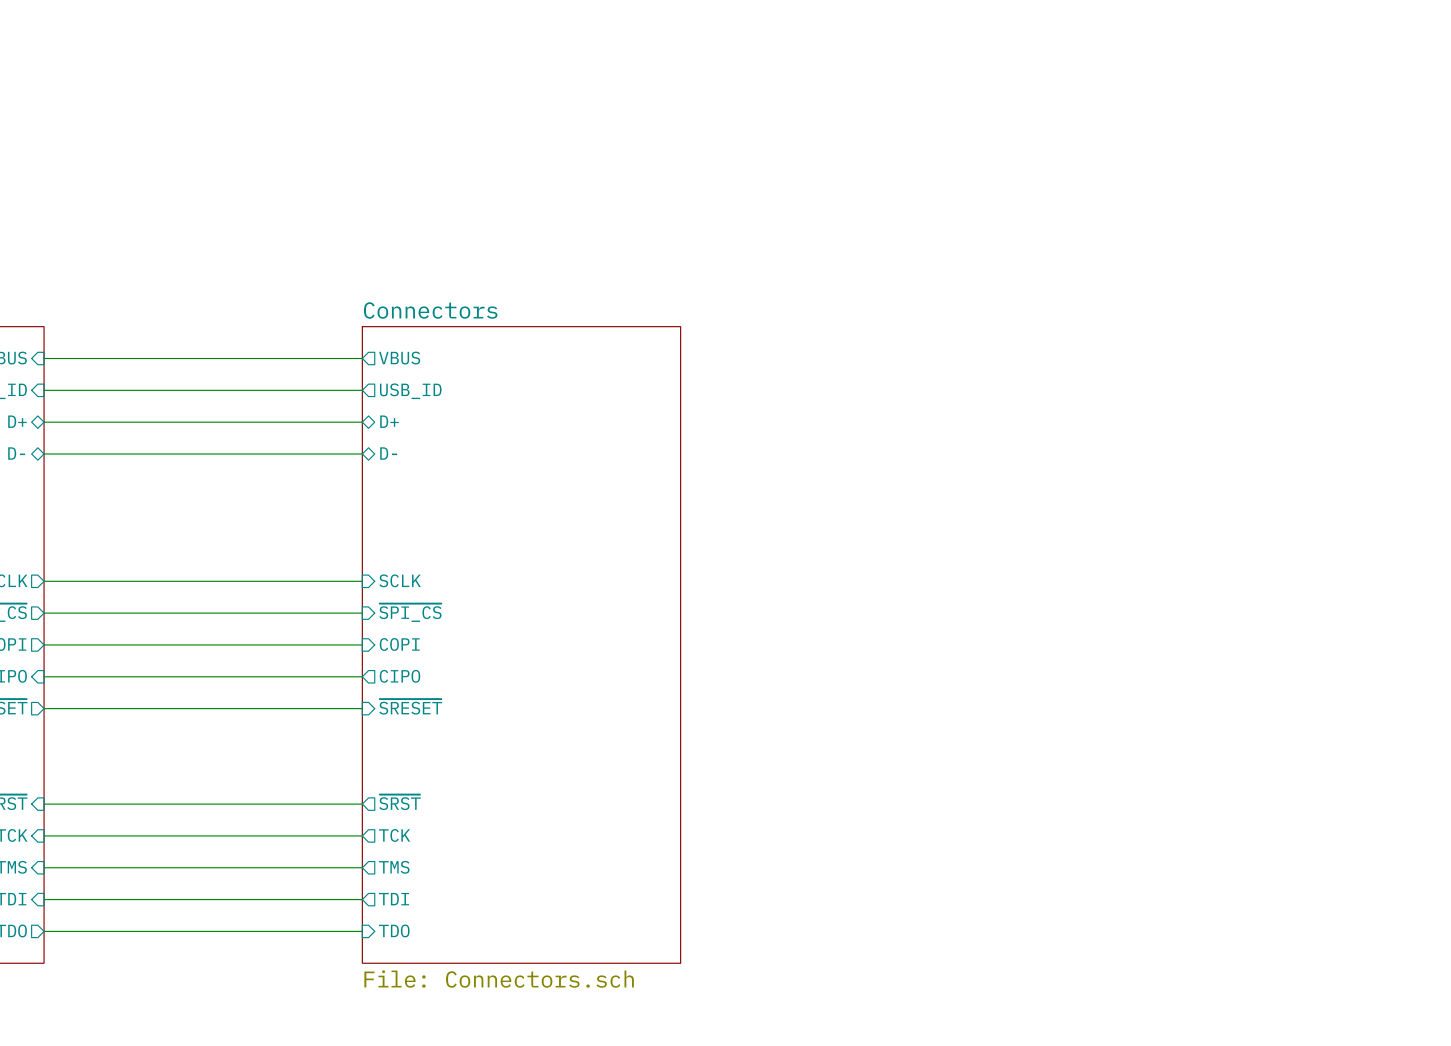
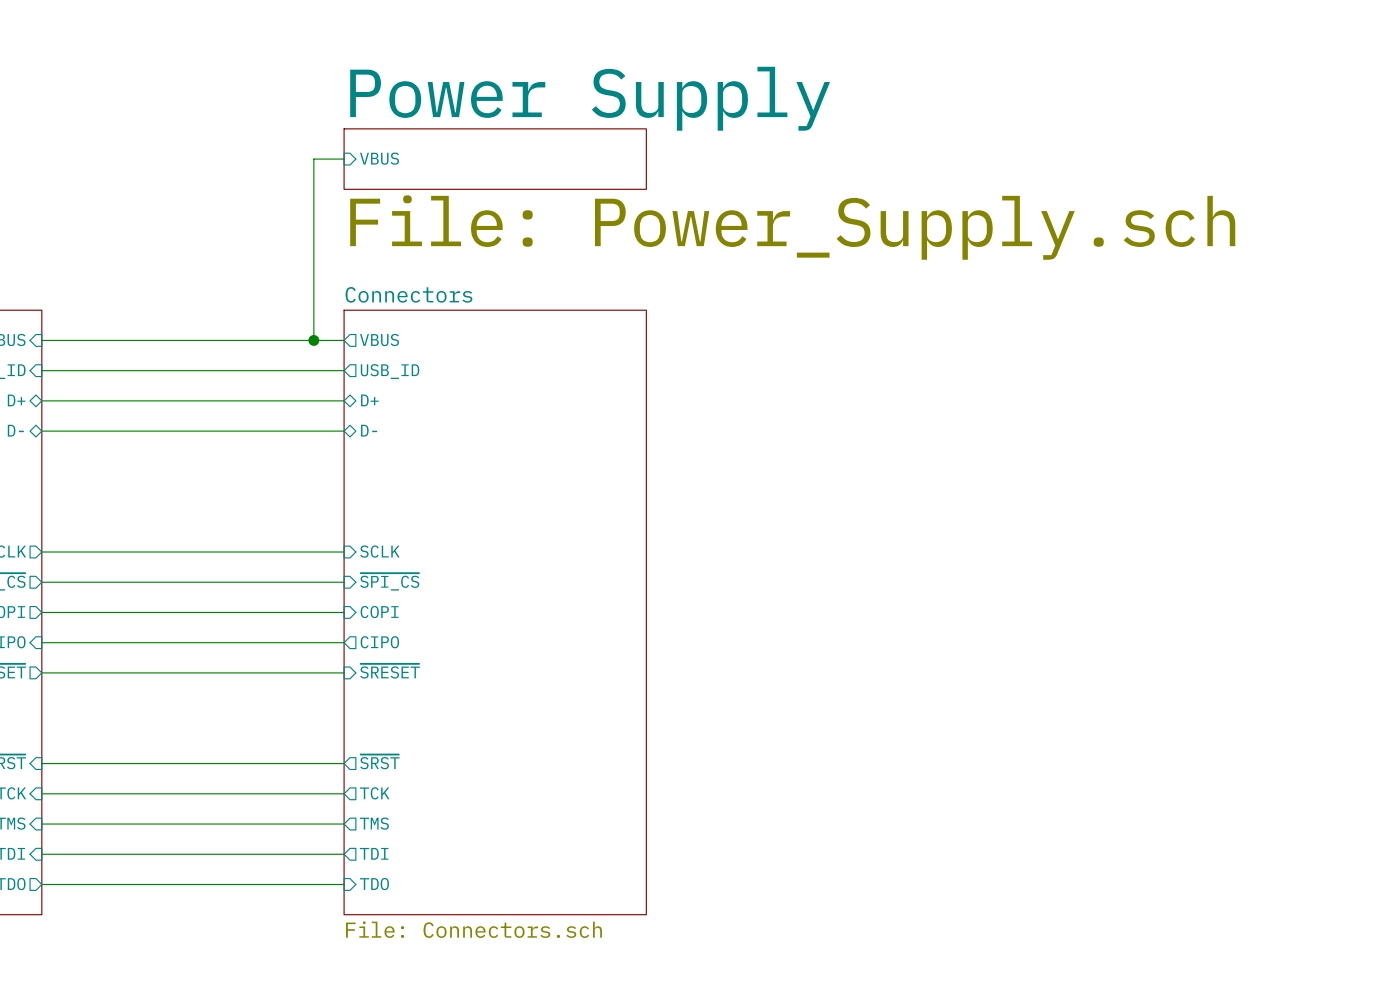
wire: none -> (344, 159) (313, 159) (313, 340)
sheet pin: none -> VBUS (379, 158)
sheet Power Supply: none -> File: Power_Supply.sch (495, 159)
junction: none -> (313, 340)

